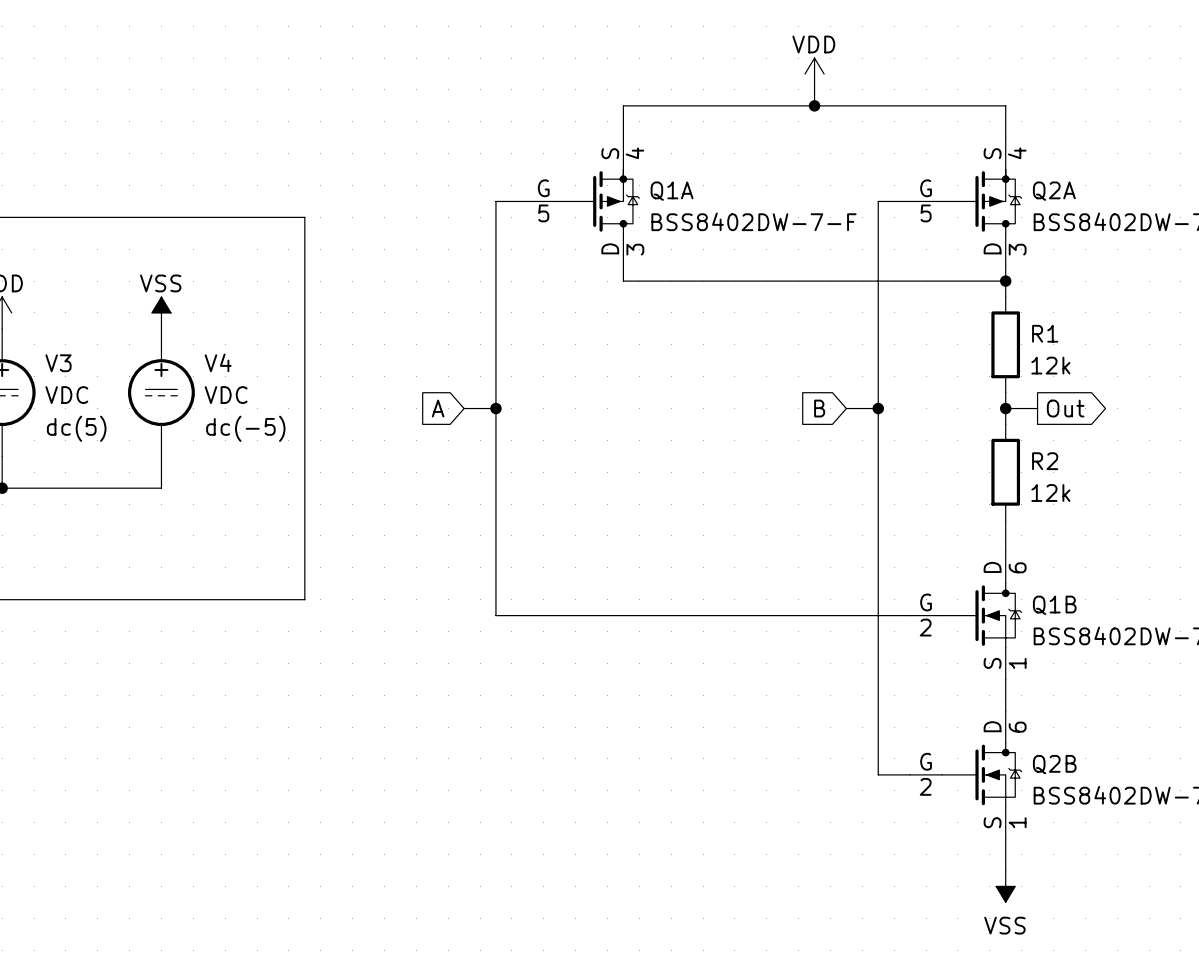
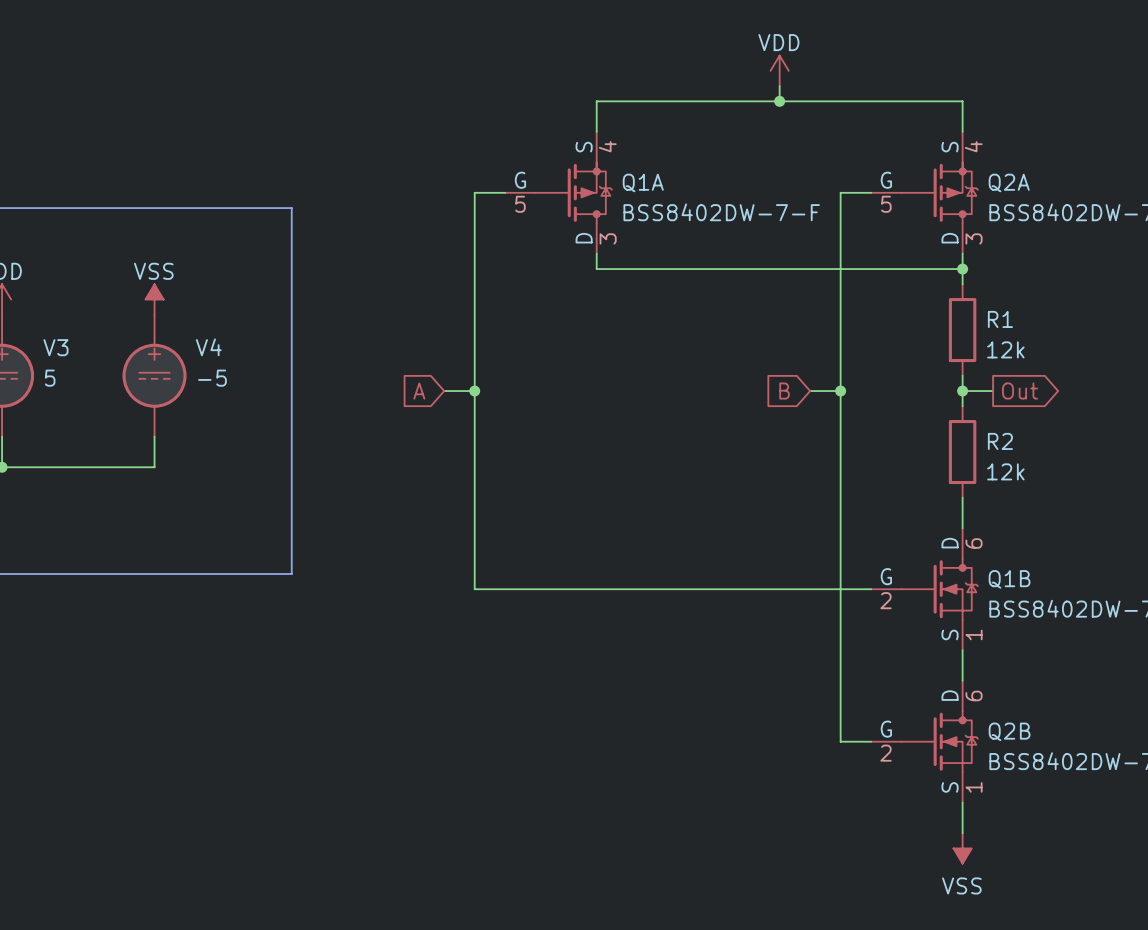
V3 value: VDC (66, 395) -> 5 (50, 378)
V4 value: VDC (226, 395) -> -5 (212, 378)
V3 text: dc(5) (76, 428) -> none
V4 text: dc(-5) (245, 428) -> none

